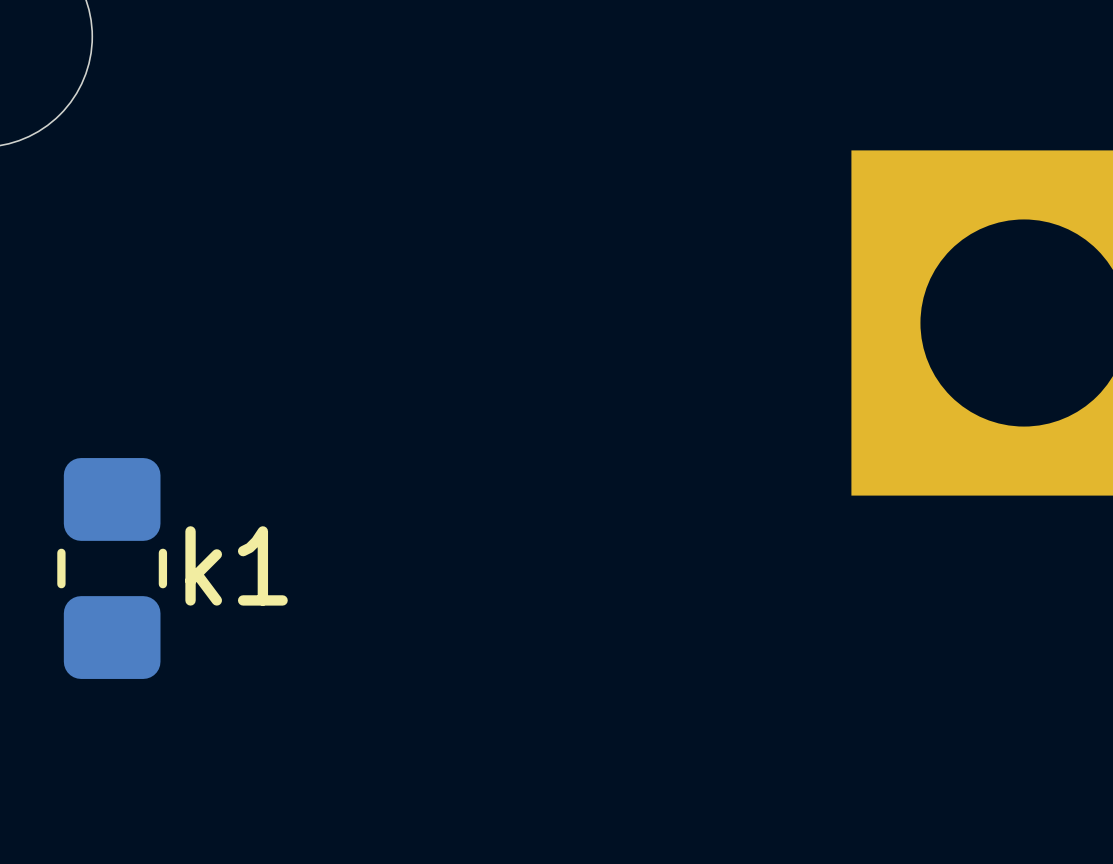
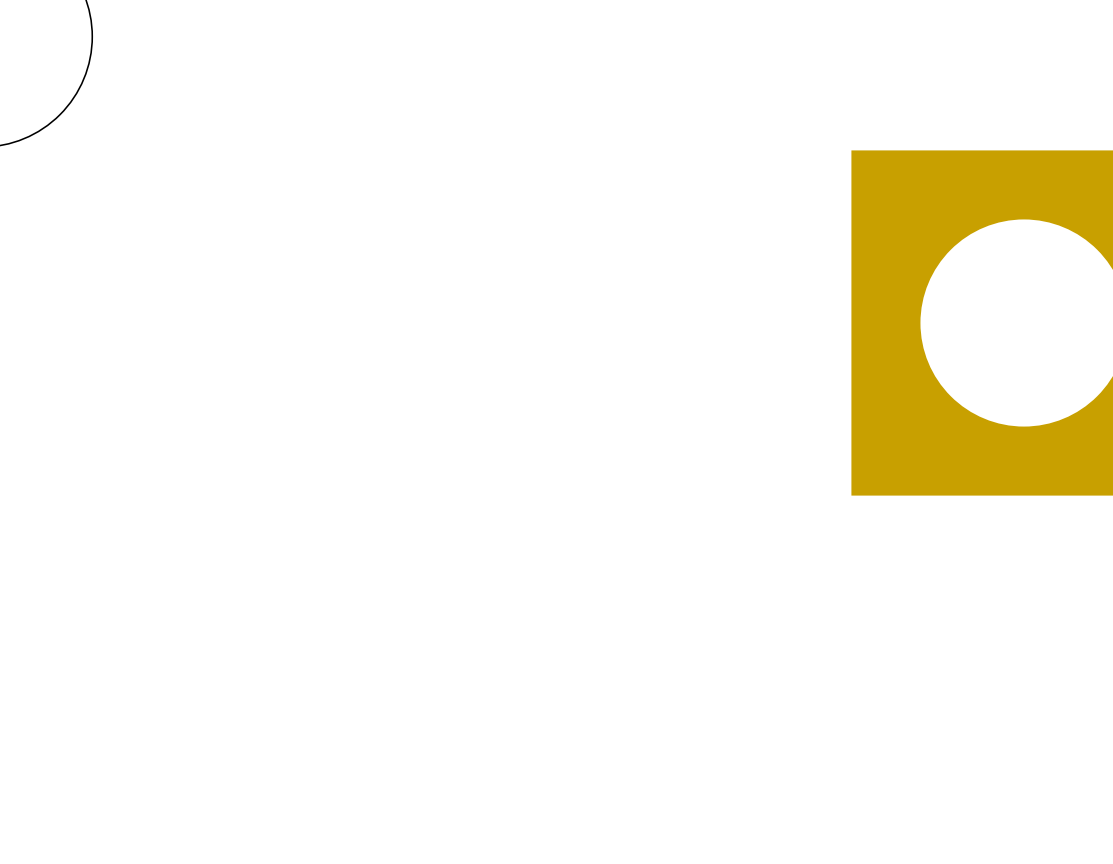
part: k1 (112, 568) -> none

